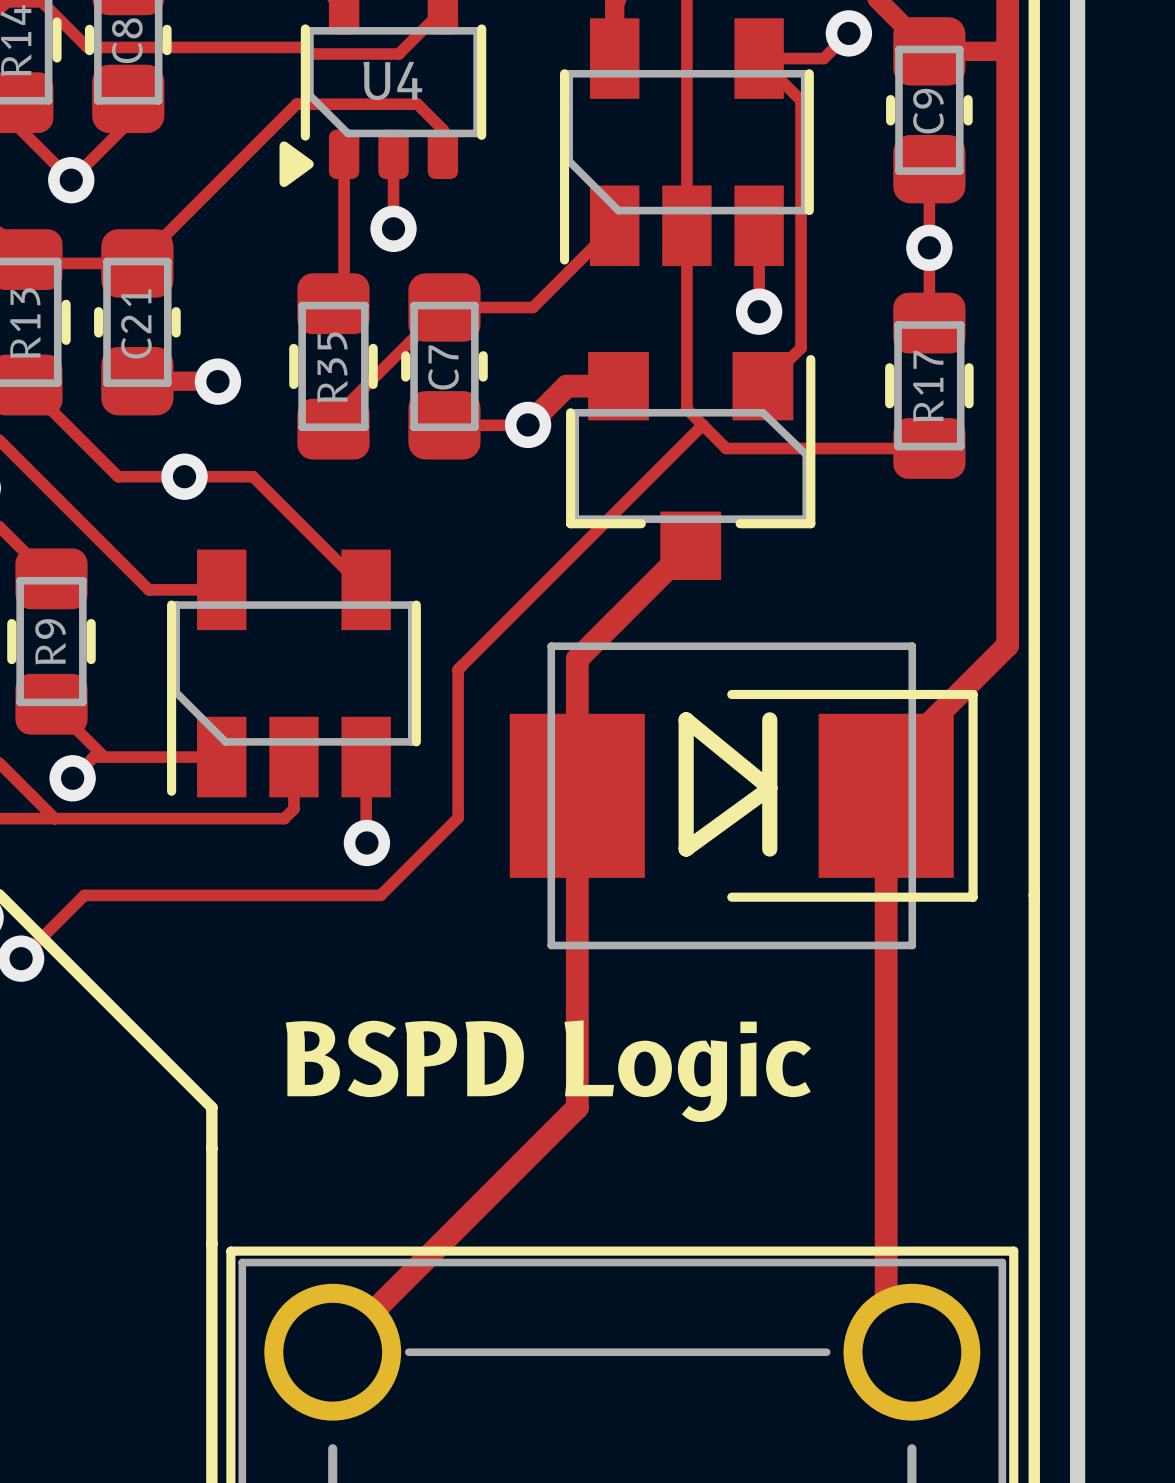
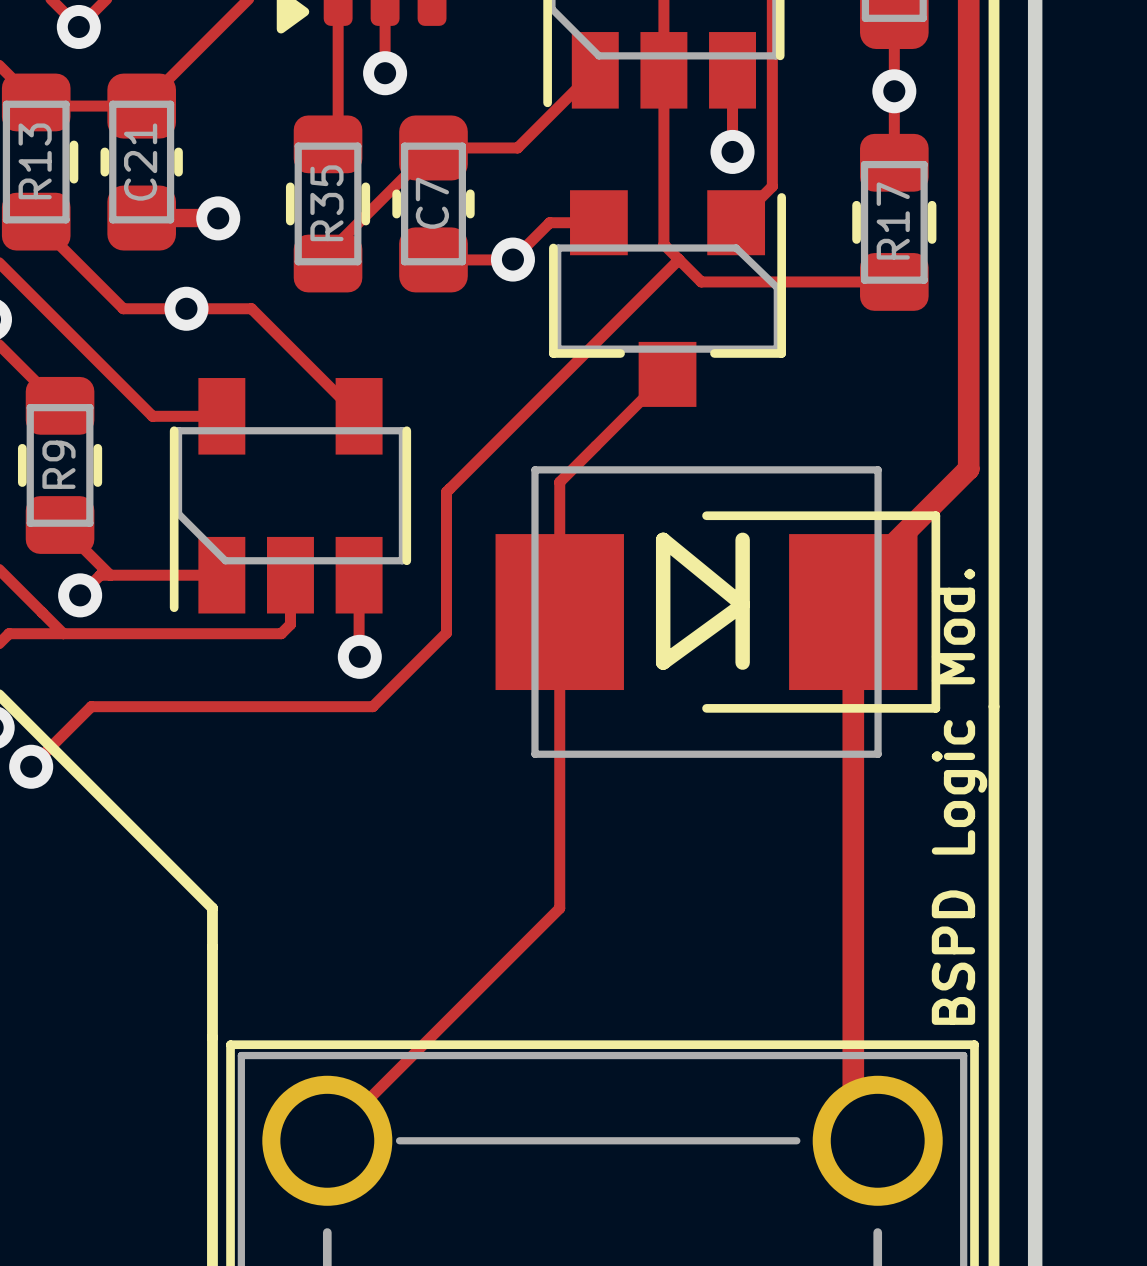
track width: thick (618, 386) (566, 386) (528, 424) -> thin (598, 222) (549, 222) (512, 259)
track width: thick (690, 545) (577, 659) (577, 1107) (332, 1352) -> thin (667, 374) (559, 482) (559, 908) (327, 1140)
text: BSPD Logic (548, 1071) -> BSPD Logic Mod. (959, 796)

